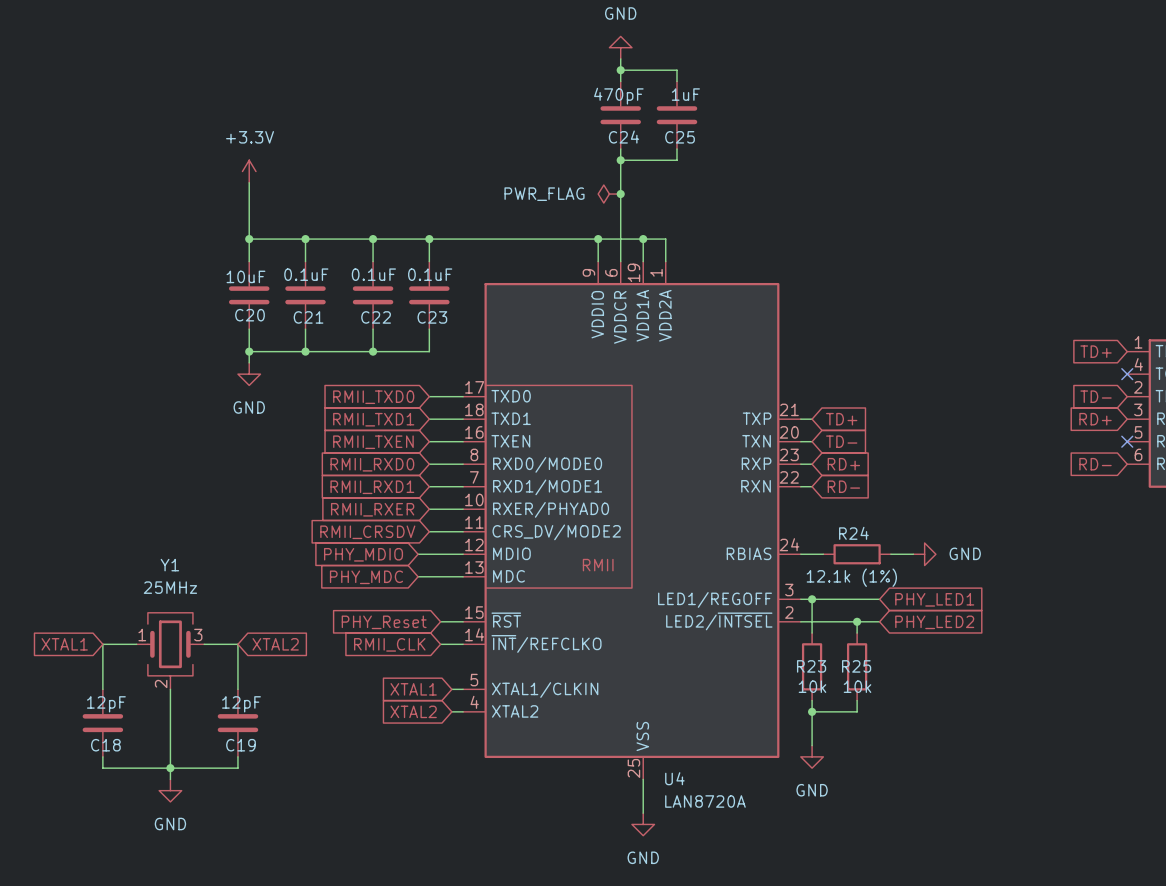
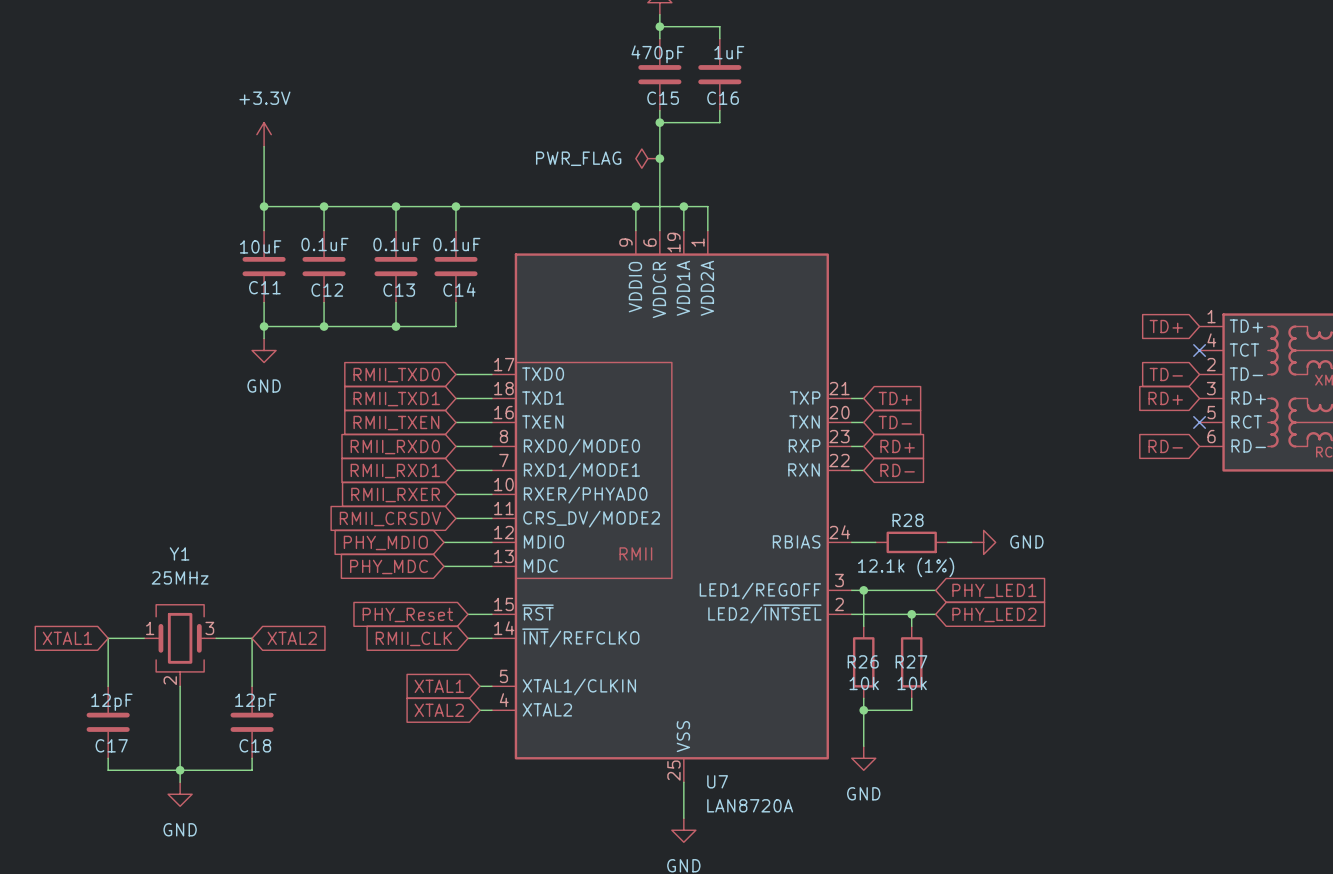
C24 name: C24 (624, 137) -> C15 (663, 98)
C25 name: C25 (680, 137) -> C16 (723, 98)
C20 name: C20 (249, 315) -> C11 (264, 287)
C21 name: C21 (308, 317) -> C12 (327, 290)
C22 name: C22 (376, 317) -> C13 (399, 290)
C23 name: C23 (432, 317) -> C14 (459, 289)
R24 name: R24 (853, 533) -> R28 (908, 520)
R23 name: R23 (811, 666) -> R26 (863, 661)
R25 name: R25 (856, 666) -> R27 (911, 661)
C18 name: C18 (105, 745) -> C17 (111, 745)
C19 name: C19 (240, 745) -> C18 (255, 745)
U4 name: U4 (674, 778) -> U7 (717, 781)

